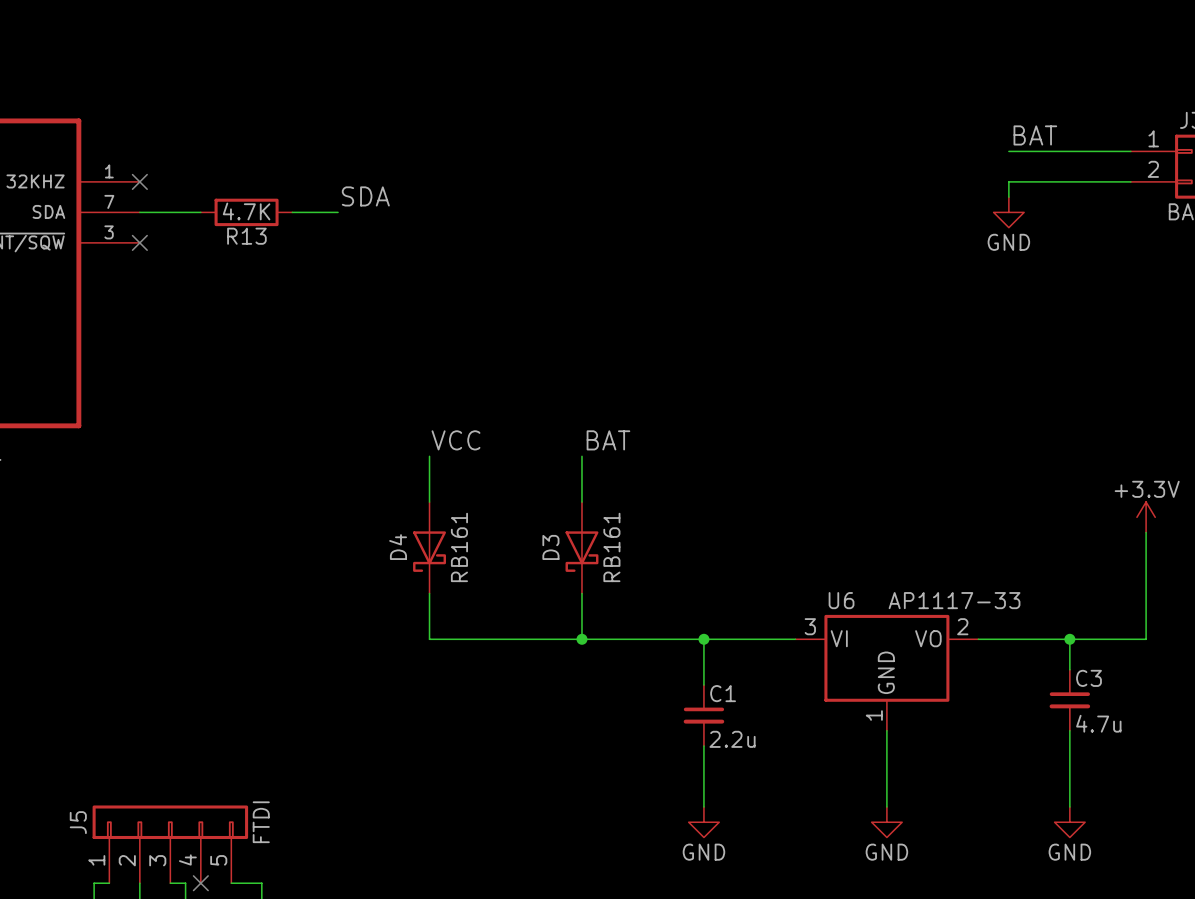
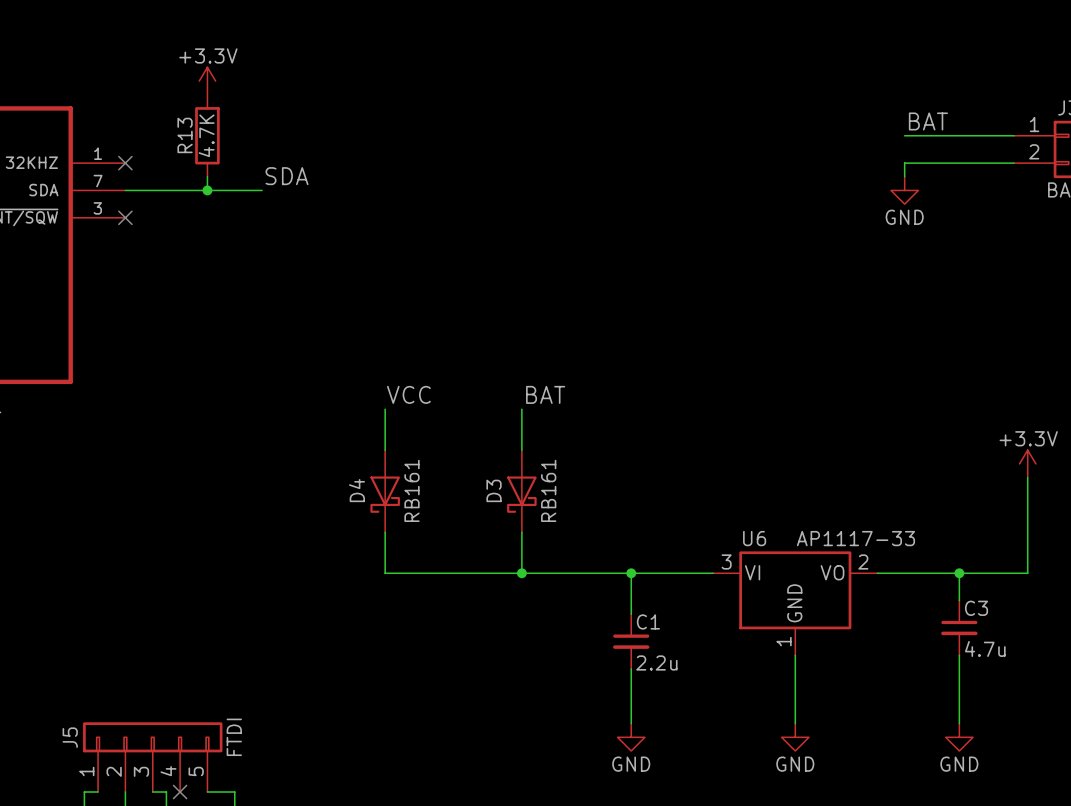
power symbol: none -> +3.3V (207, 81)
label position: SDA (365, 196) -> SDA (287, 176)
wire: none -> (207, 176) (207, 190)
junction: none -> (207, 190)
R13 rotation: 0° (246, 212) -> 90° clockwise (207, 135)
R13 position: (246, 212) -> (207, 135)
wire: (292, 212) (338, 212) -> (262, 190) (180, 190)

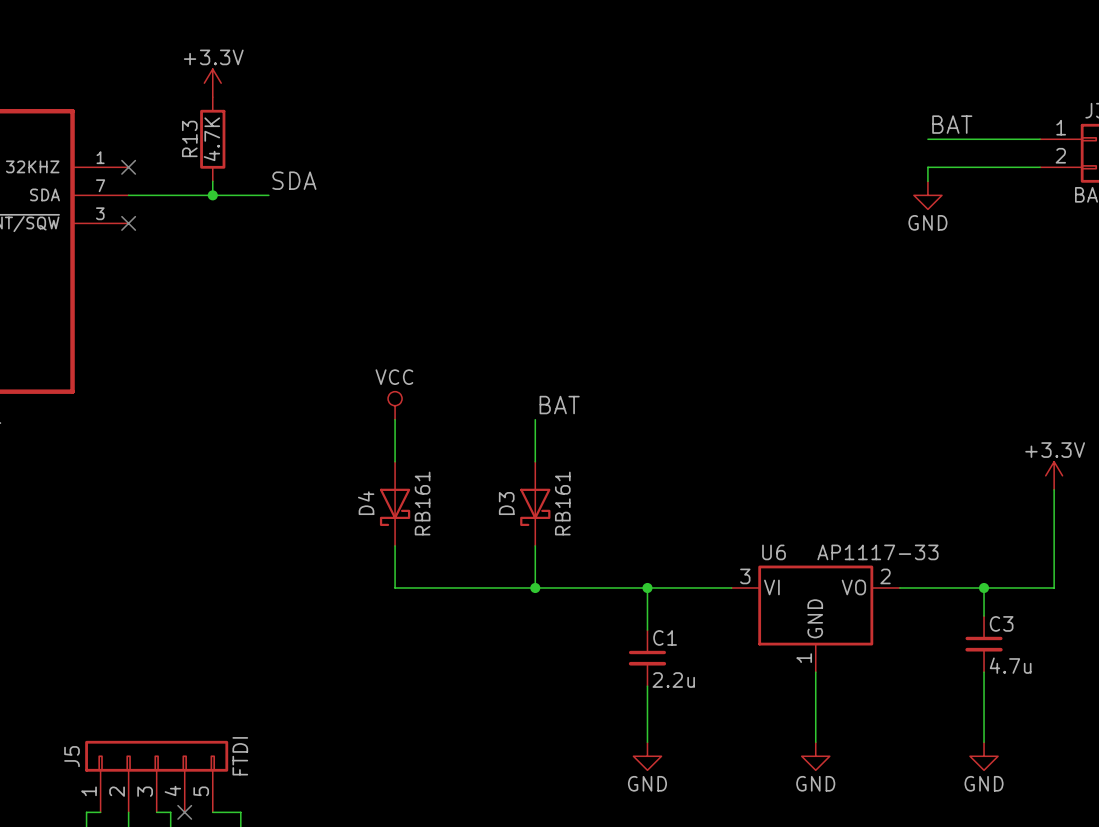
label: VCC (408, 394) -> none
power symbol: none -> VCC (395, 405)

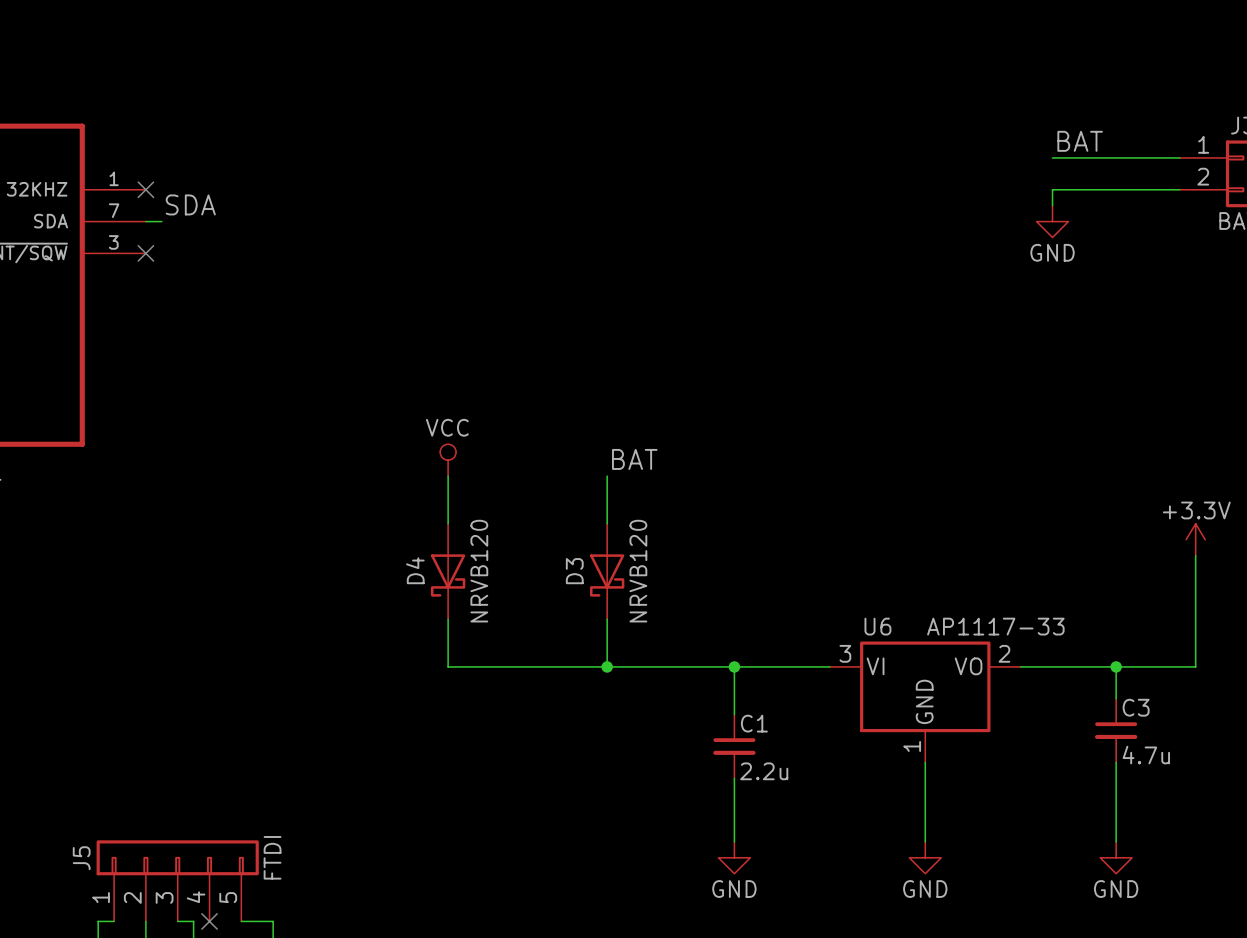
power symbol: +3.3V (212, 83) -> none
R13: 4.7K (212, 139) -> none
label position: SDA (294, 180) -> SDA (190, 204)
wire: (212, 181) (212, 195) -> none
wire: (142, 195) (268, 195) -> none
junction: (212, 195) -> none
D4 value: RB161 (422, 503) -> NRVB120 (479, 571)
D3 value: RB161 (562, 503) -> NRVB120 (638, 571)

